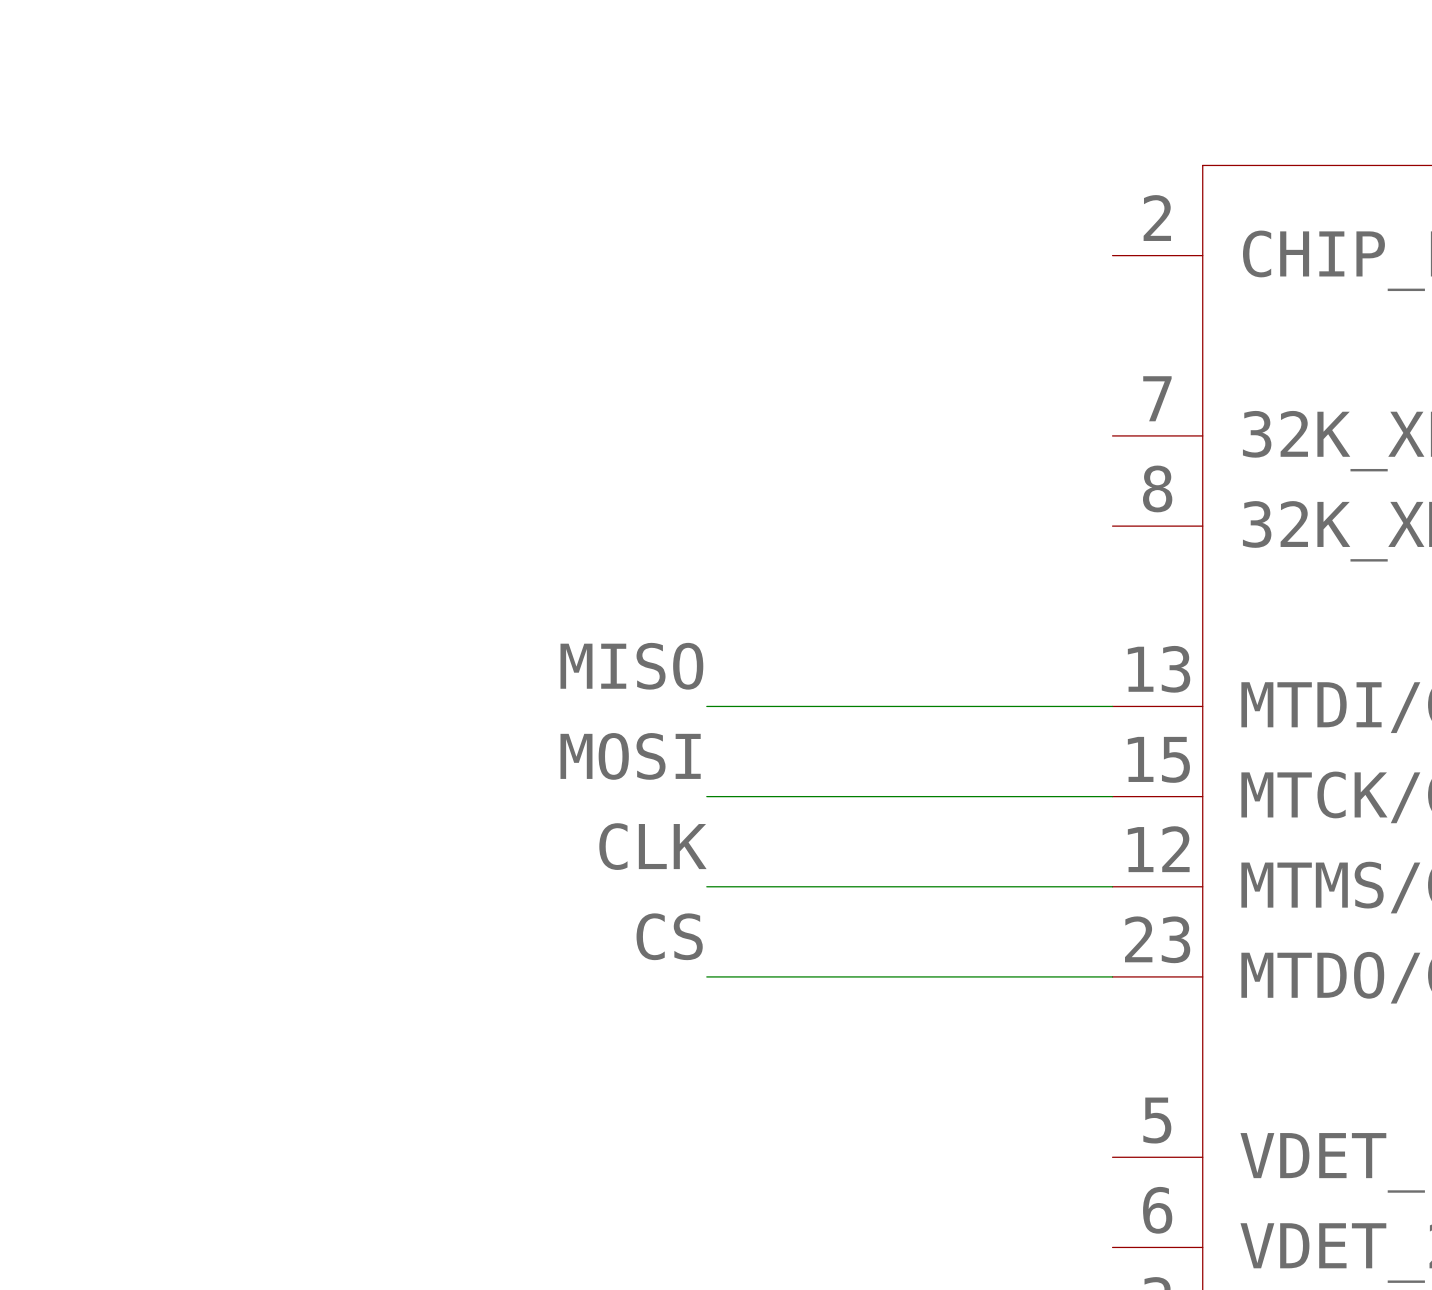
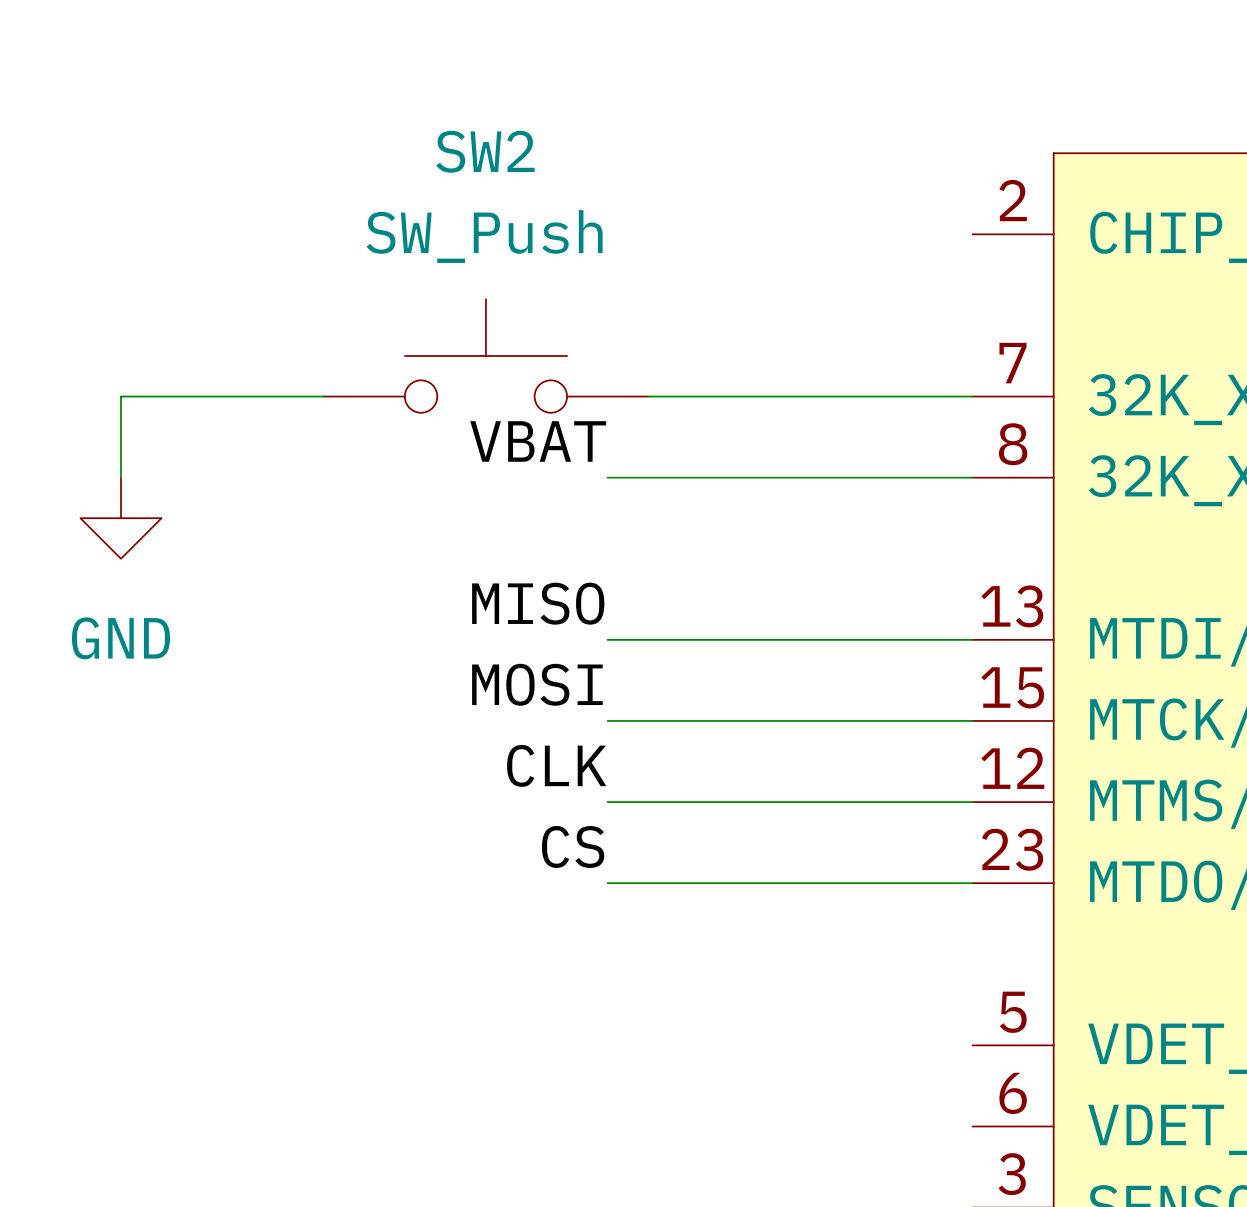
SW2: none -> SW_Push (485, 356)
wire: none -> (323, 396) (120, 396) (120, 477)
wire: none -> (648, 396) (972, 396)
label: none -> VBAT (538, 441)
wire: none -> (607, 477) (972, 477)
power symbol: none -> GND (120, 518)

